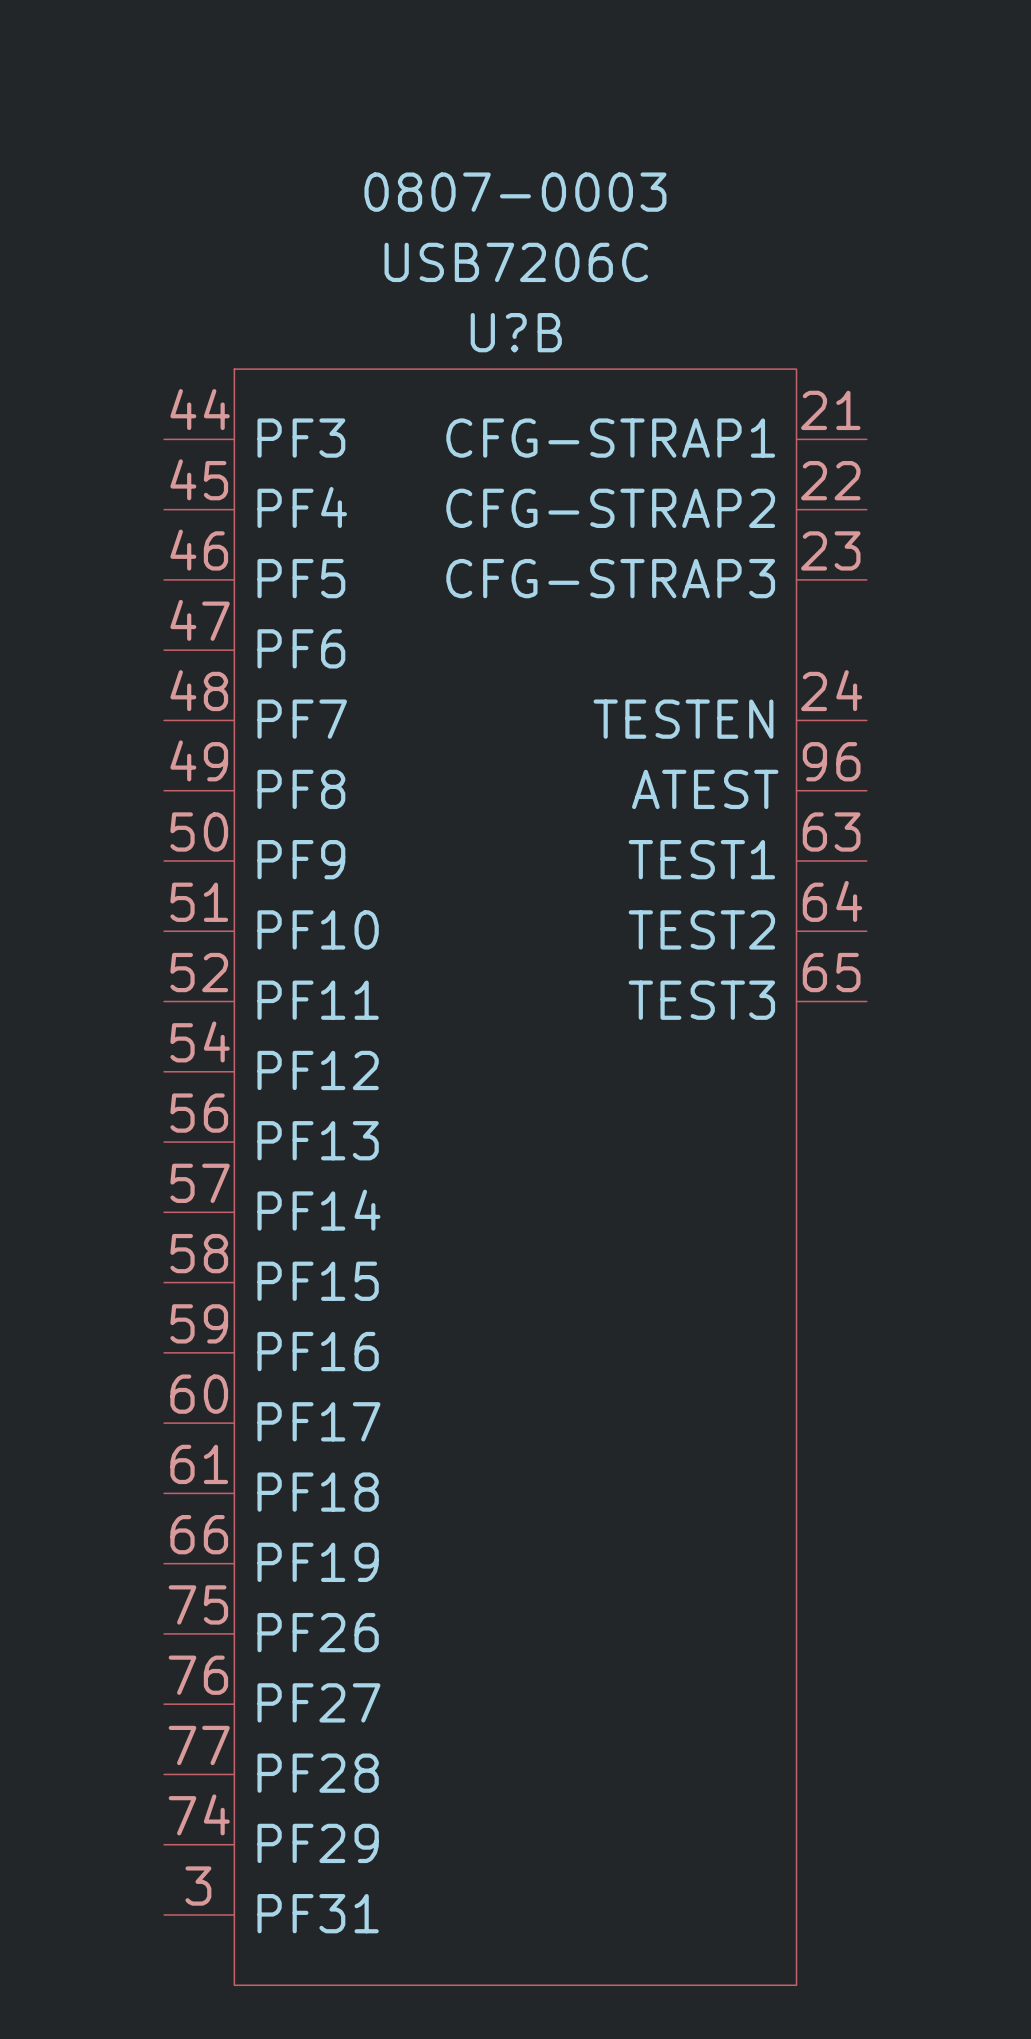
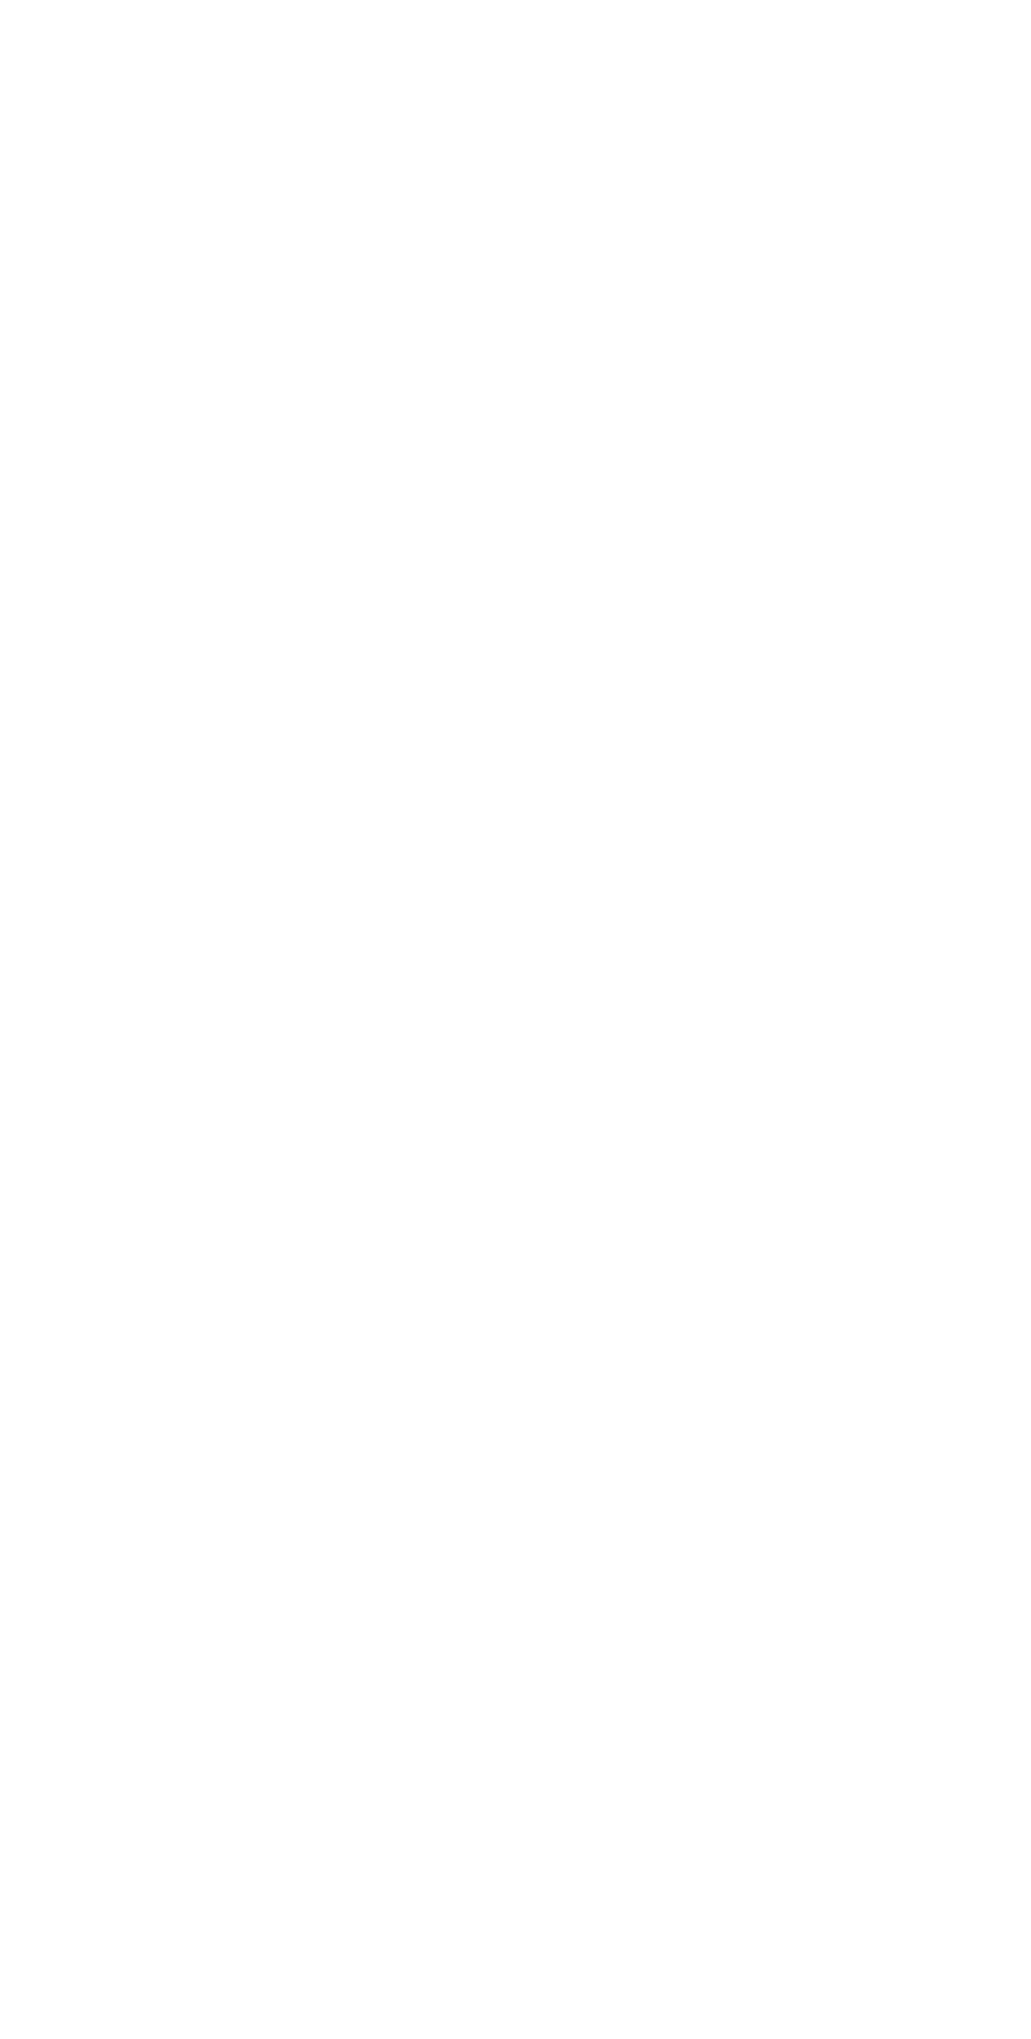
U?B: USB7206C (515, 1177) -> none

